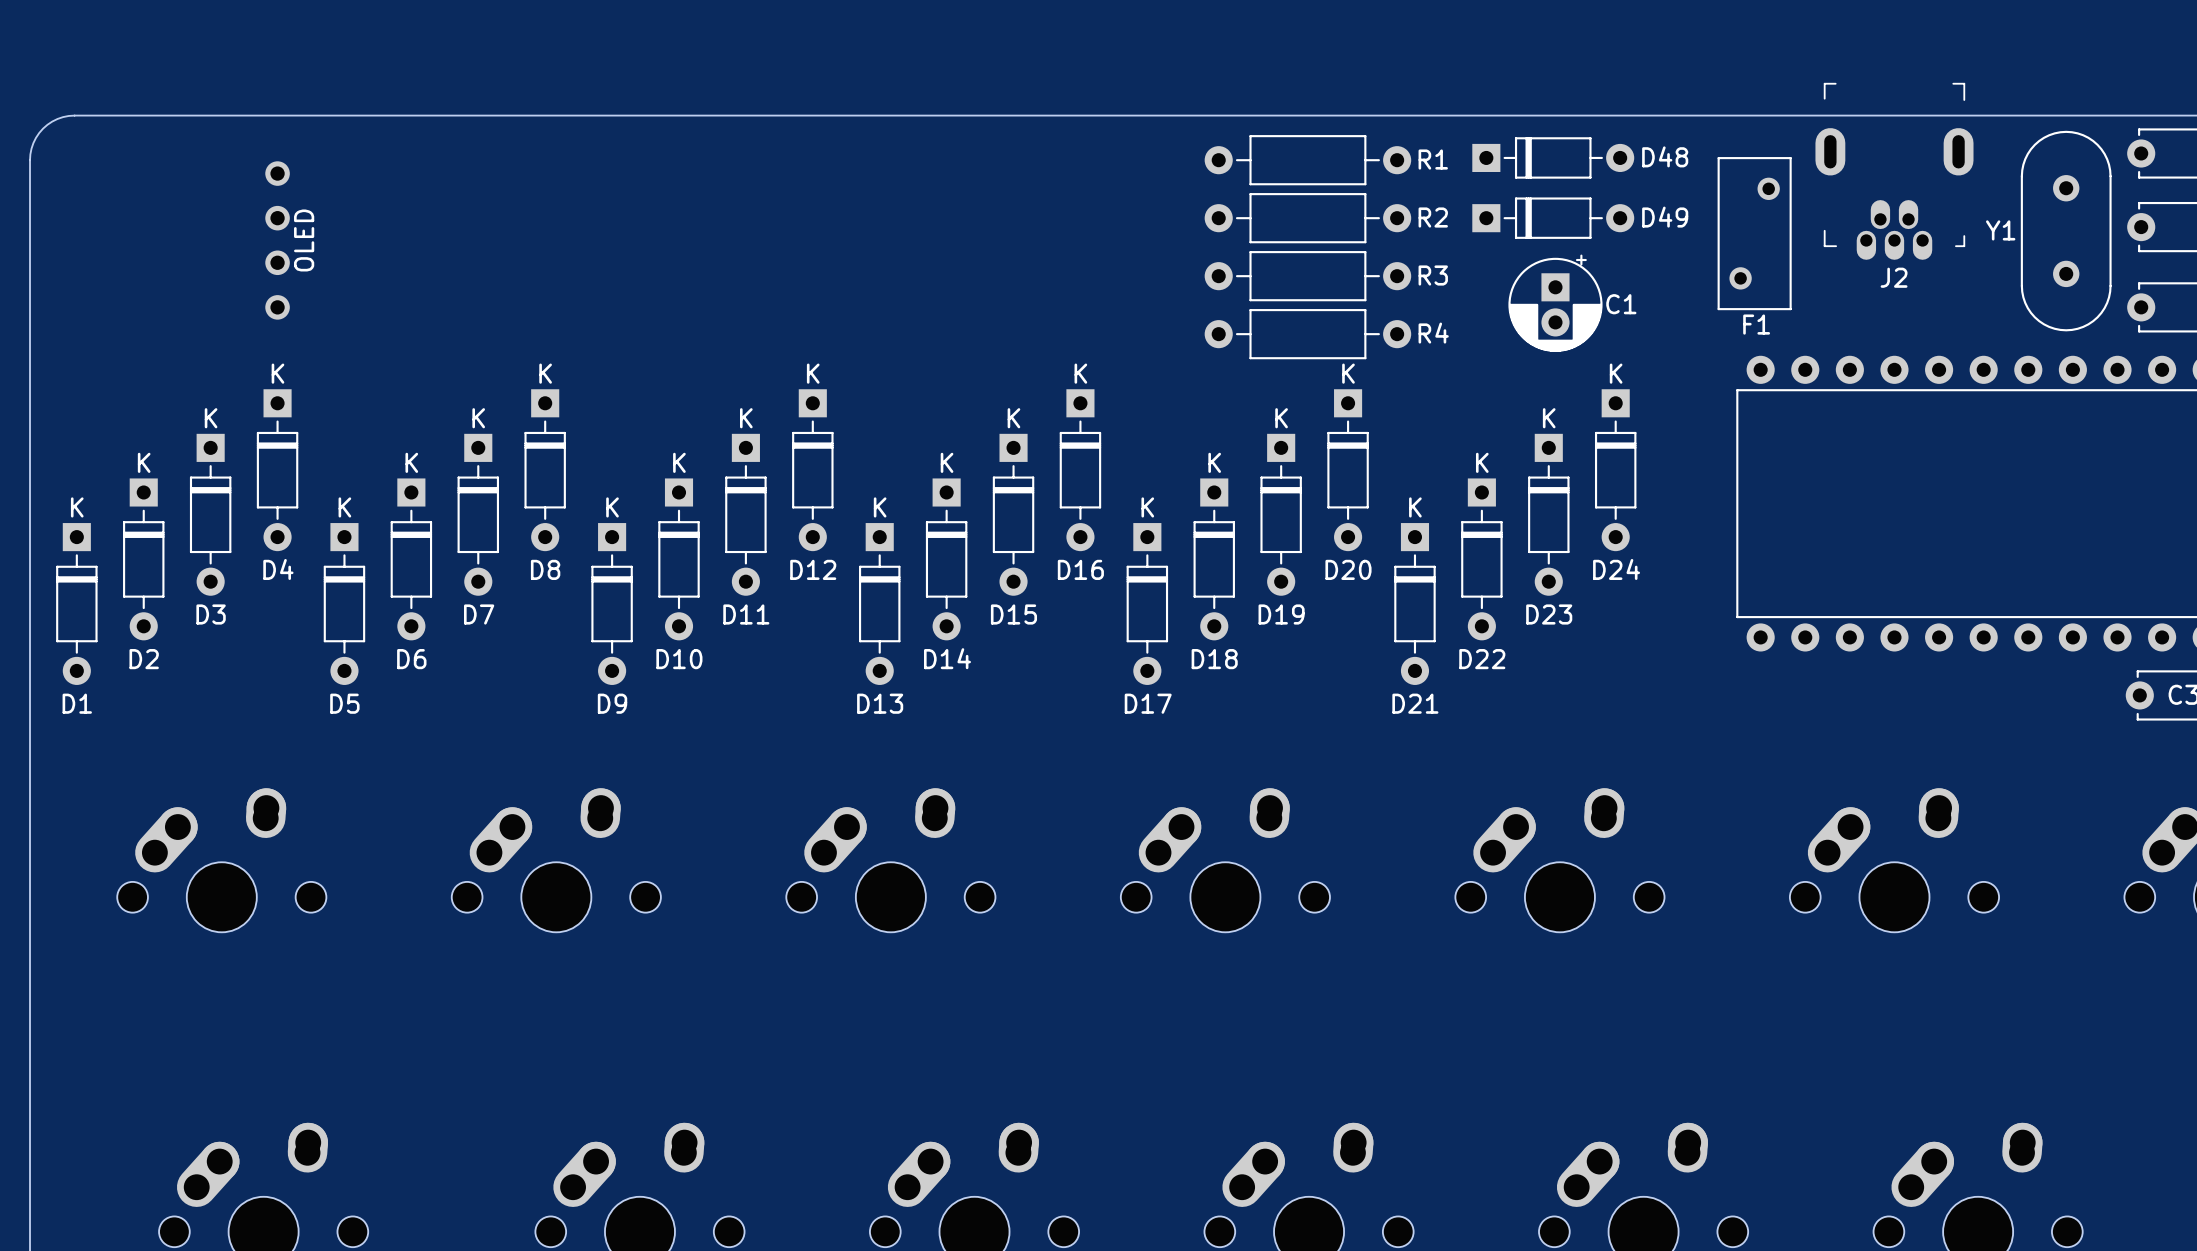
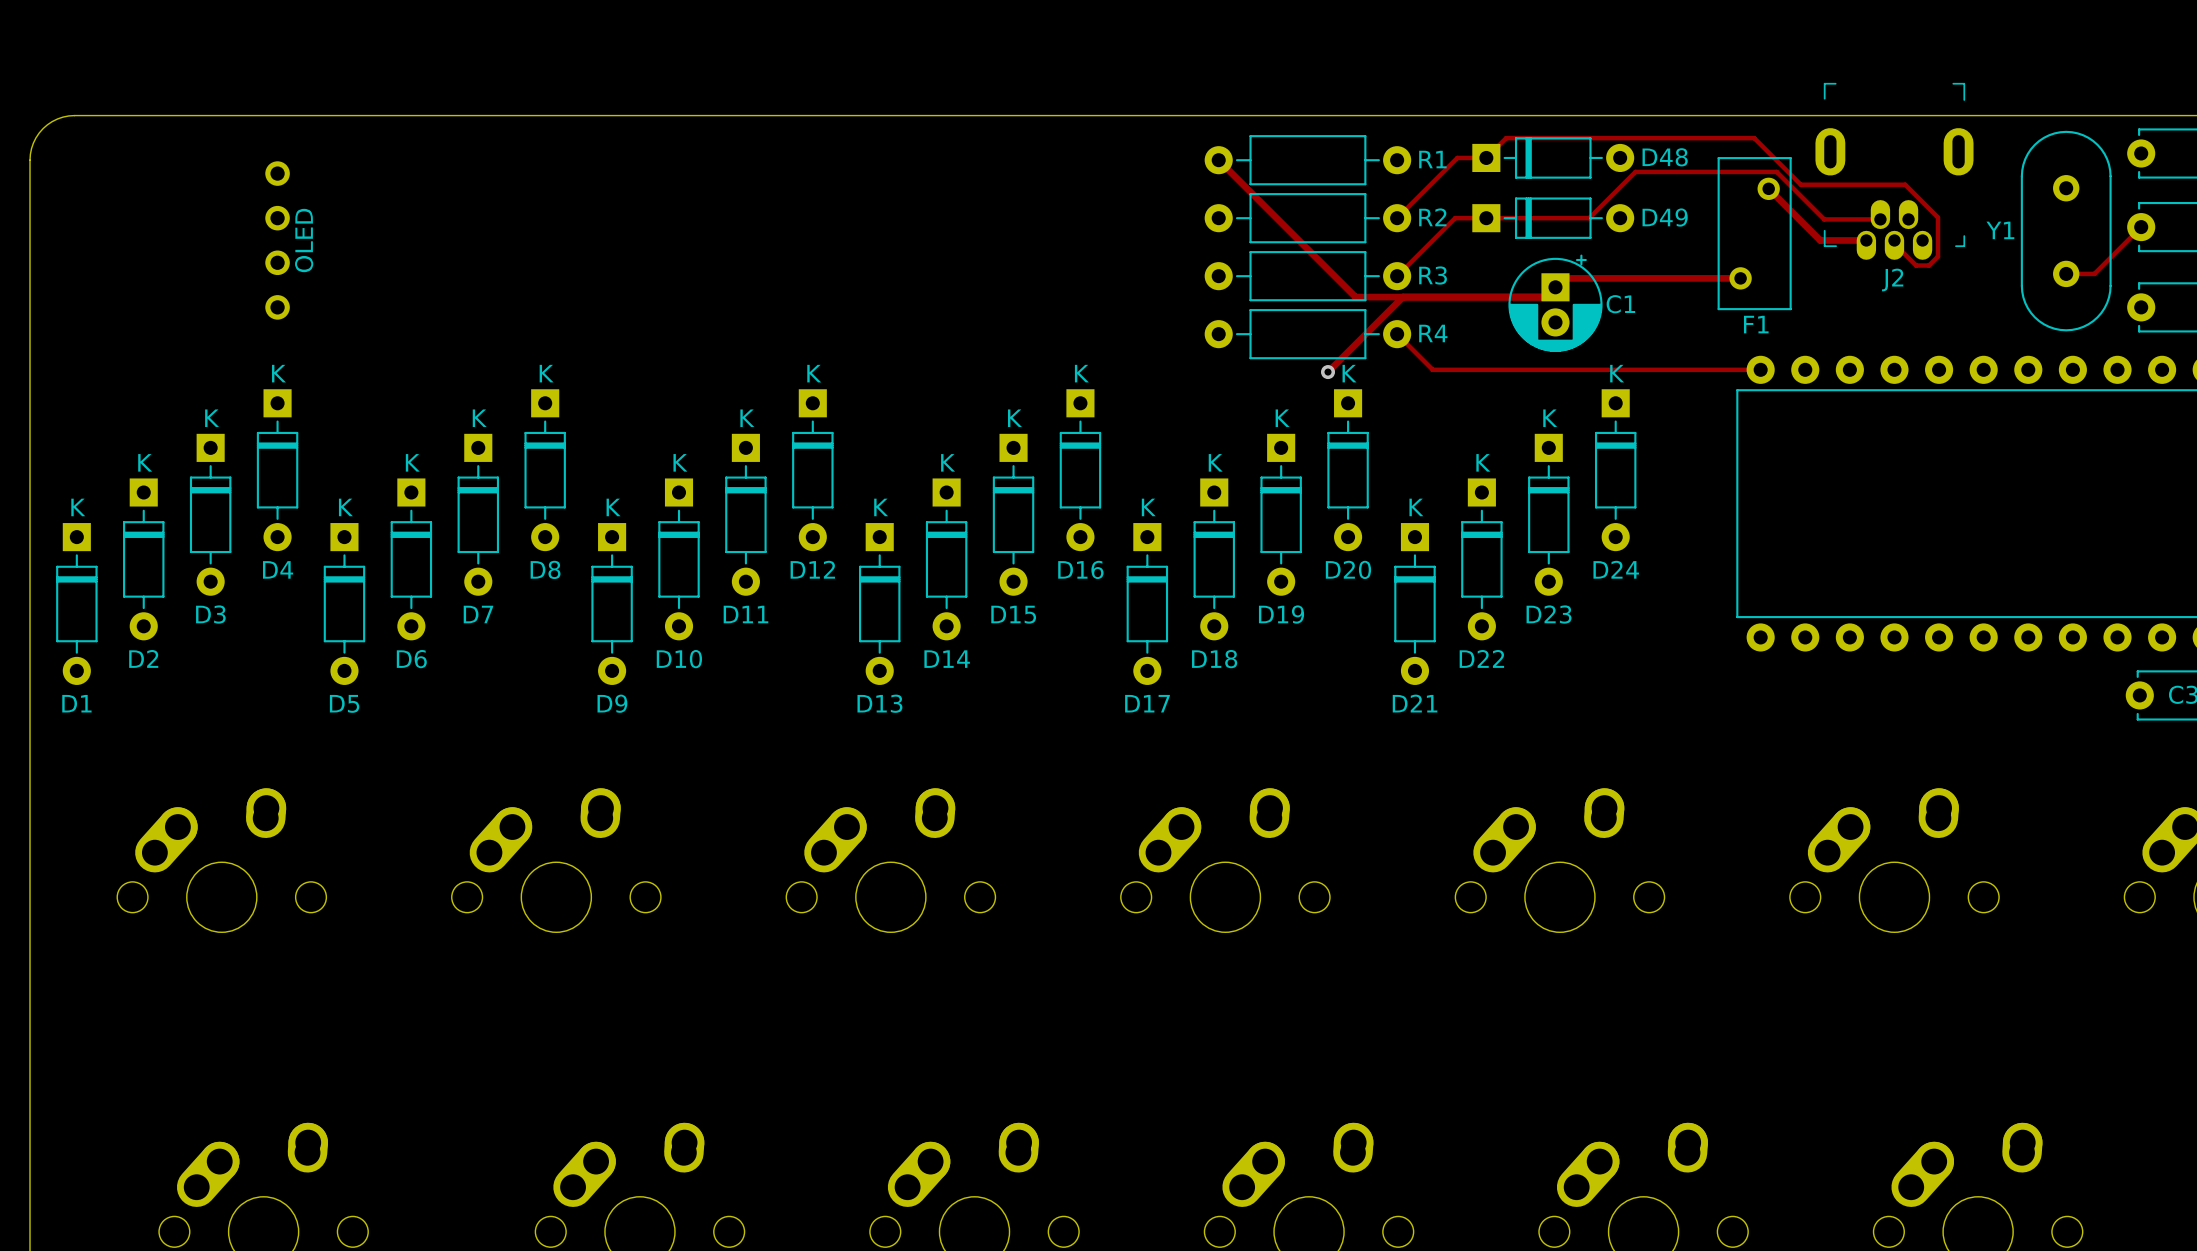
track: none -> (1218, 160) (1355, 297) (1545, 297) (1564, 278) (1740, 278)
track: none -> (1768, 188) (1820, 240) (1866, 240)
track: none -> (1397, 218) (1457, 157) (1486, 157) (1506, 138) (1754, 138) (1800, 184) (1905, 184) (1937, 217) (1937, 256) (1928, 265) (1916, 265) (1894, 243) (1894, 240)
track: none -> (1880, 219) (1824, 219) (1776, 171) (1635, 171) (1589, 218) (1455, 218) (1397, 276)
track: none -> (2141, 227) (2094, 273) (2066, 273)
track: none -> (1402, 297) (1328, 372)
track: none -> (1397, 334) (1432, 369) (1760, 369)
via: none -> (1328, 372)

